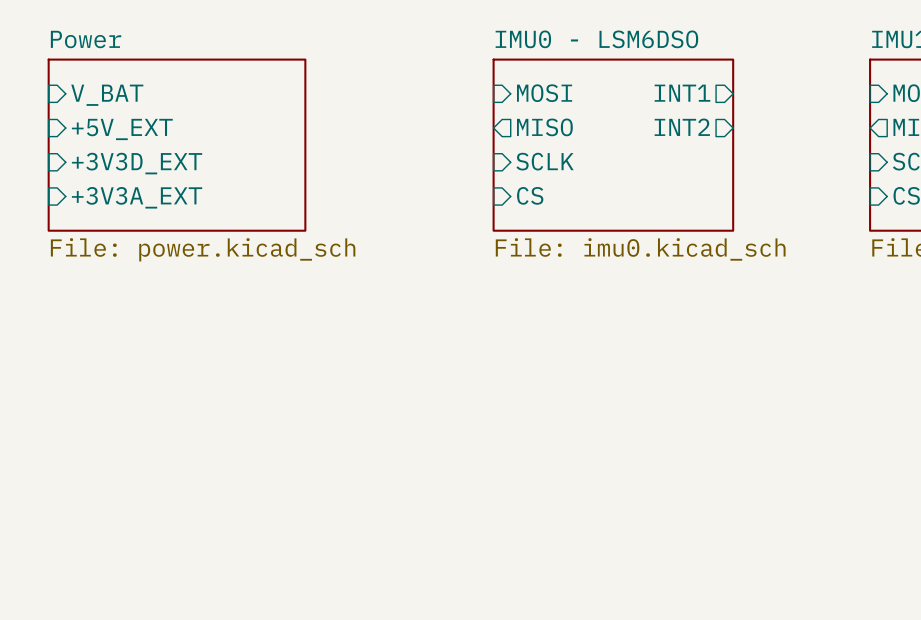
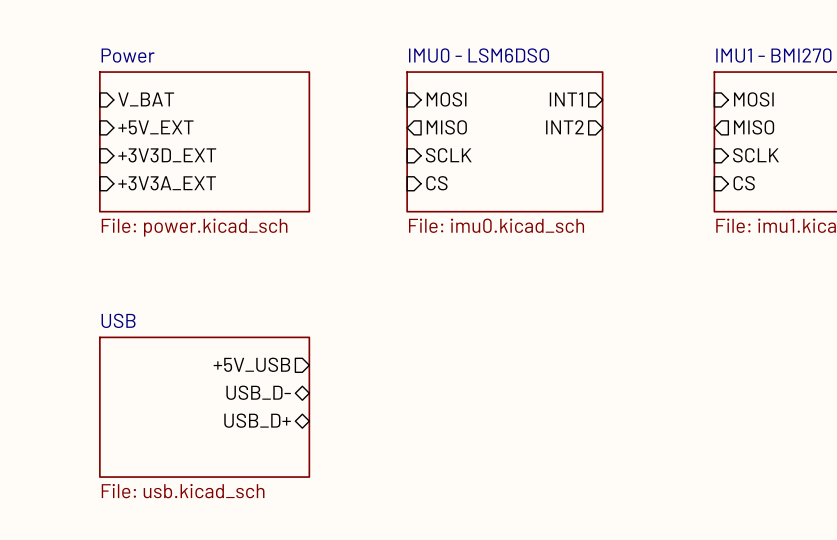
sheet pin position: V_BAT (107, 95) -> V_BAT (146, 99)
sheet pin position: +5V_EXT (122, 129) -> +5V_EXT (155, 127)
sheet Power position: (177, 145) -> (204, 141)
sheet pin position: +3V3D_EXT (137, 163) -> +3V3D_EXT (167, 155)
sheet pin position: +3V3A_EXT (137, 197) -> +3V3A_EXT (167, 183)
sheet pin: none -> +5V_USB (251, 364)
sheet pin: none -> USB_D- (258, 392)
sheet USB: none -> File: usb.kicad_sch (204, 407)
sheet pin: none -> USB_D+ (257, 420)

